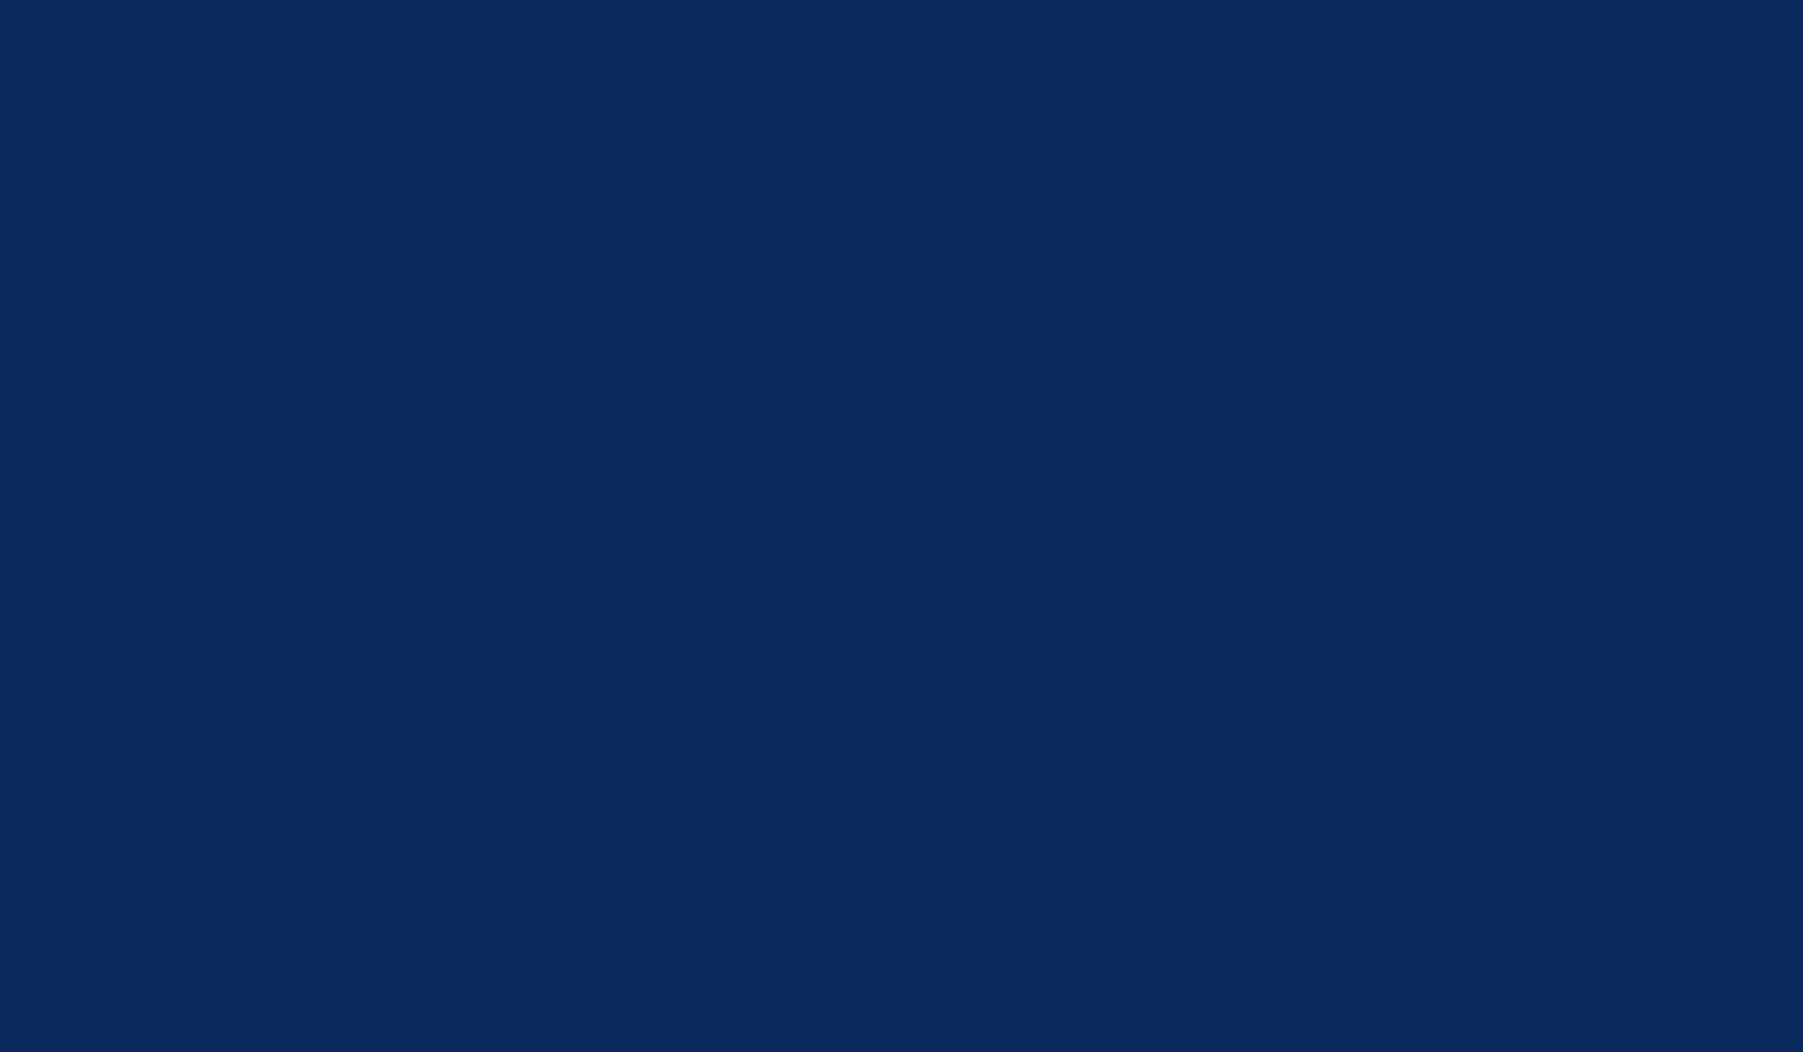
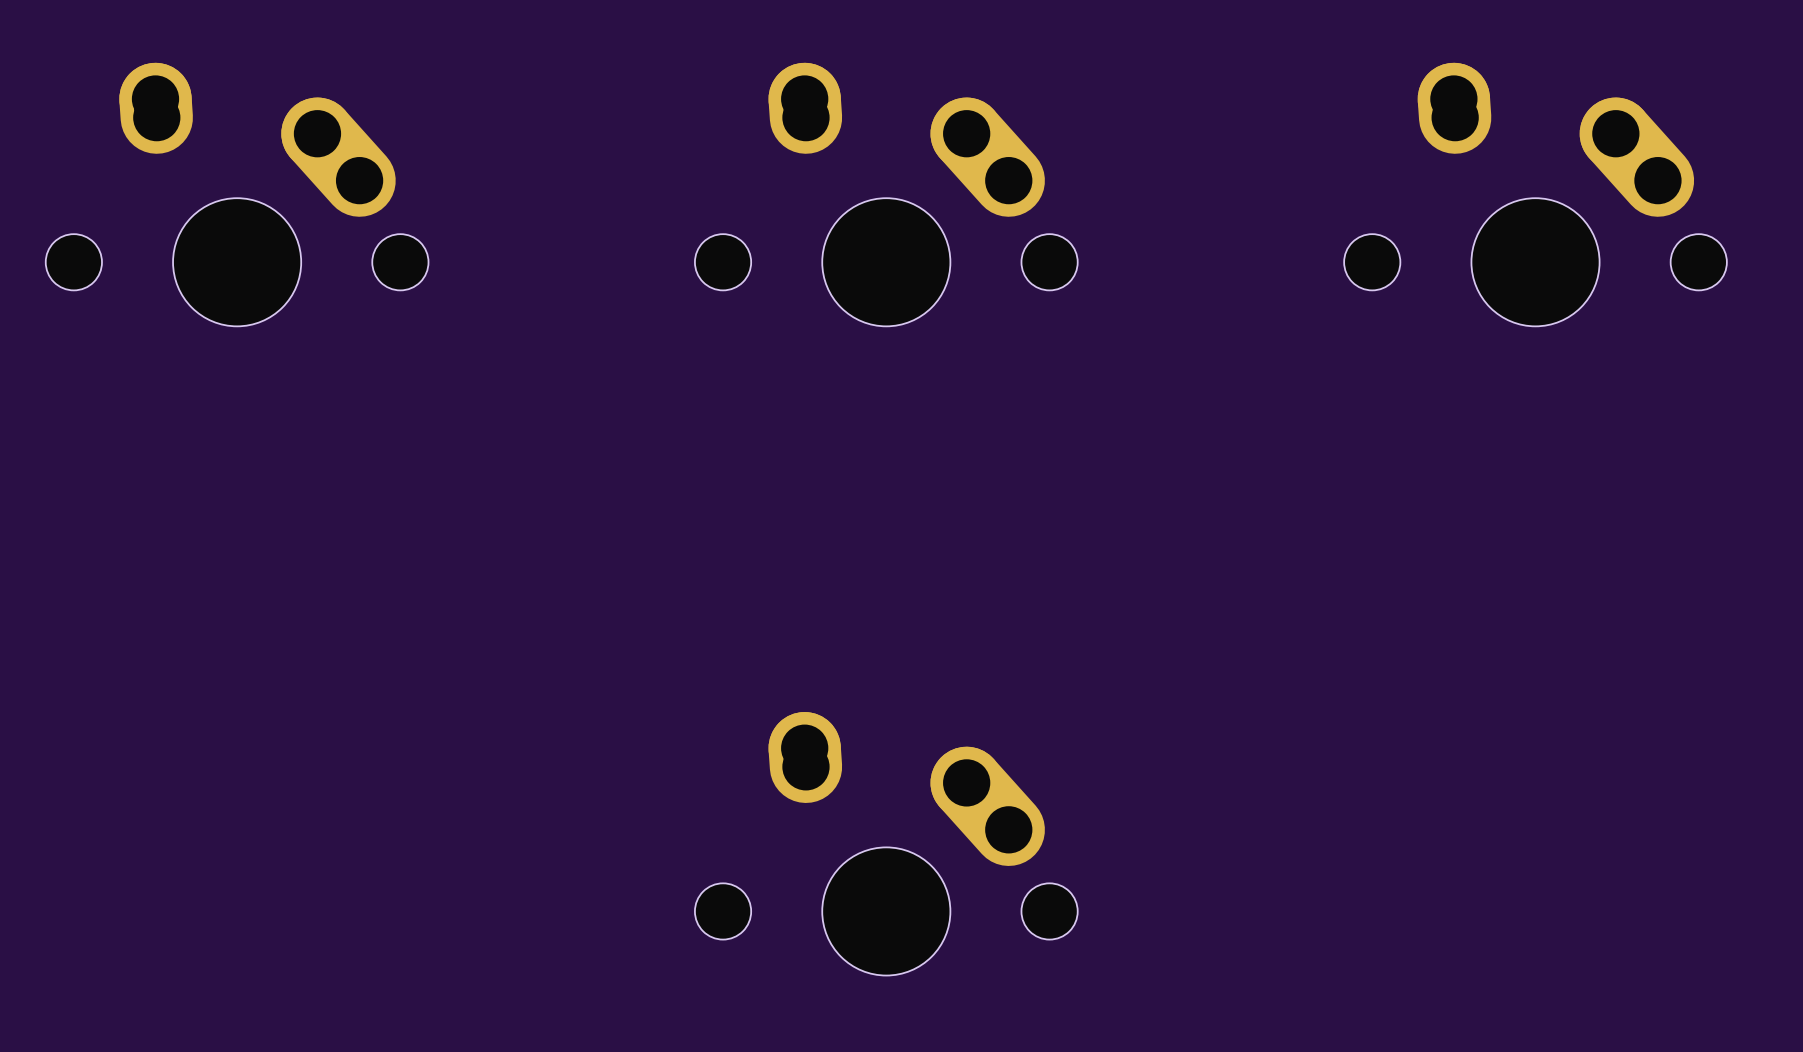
part: none -> (237, 194)
part: none -> (886, 194)
part: none -> (1535, 194)
part: none -> (886, 843)

